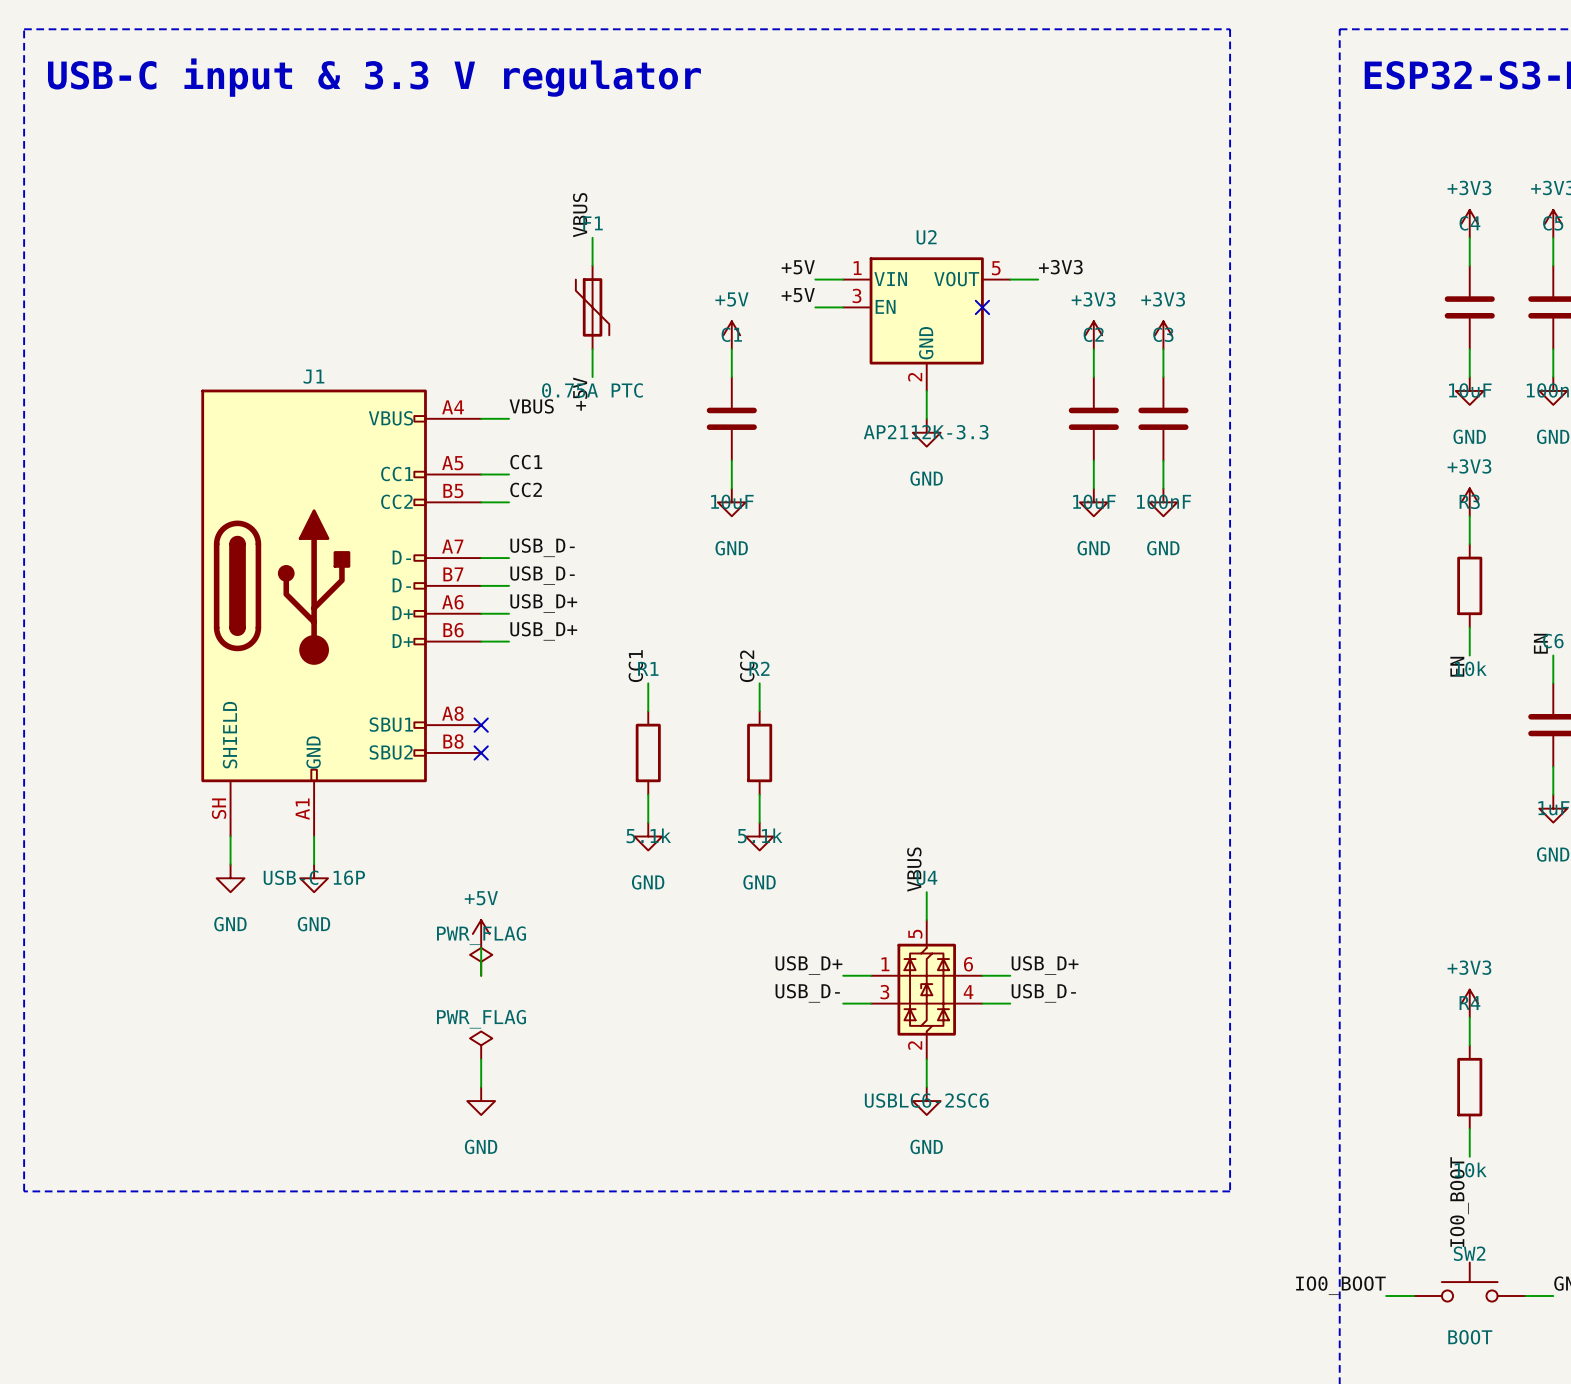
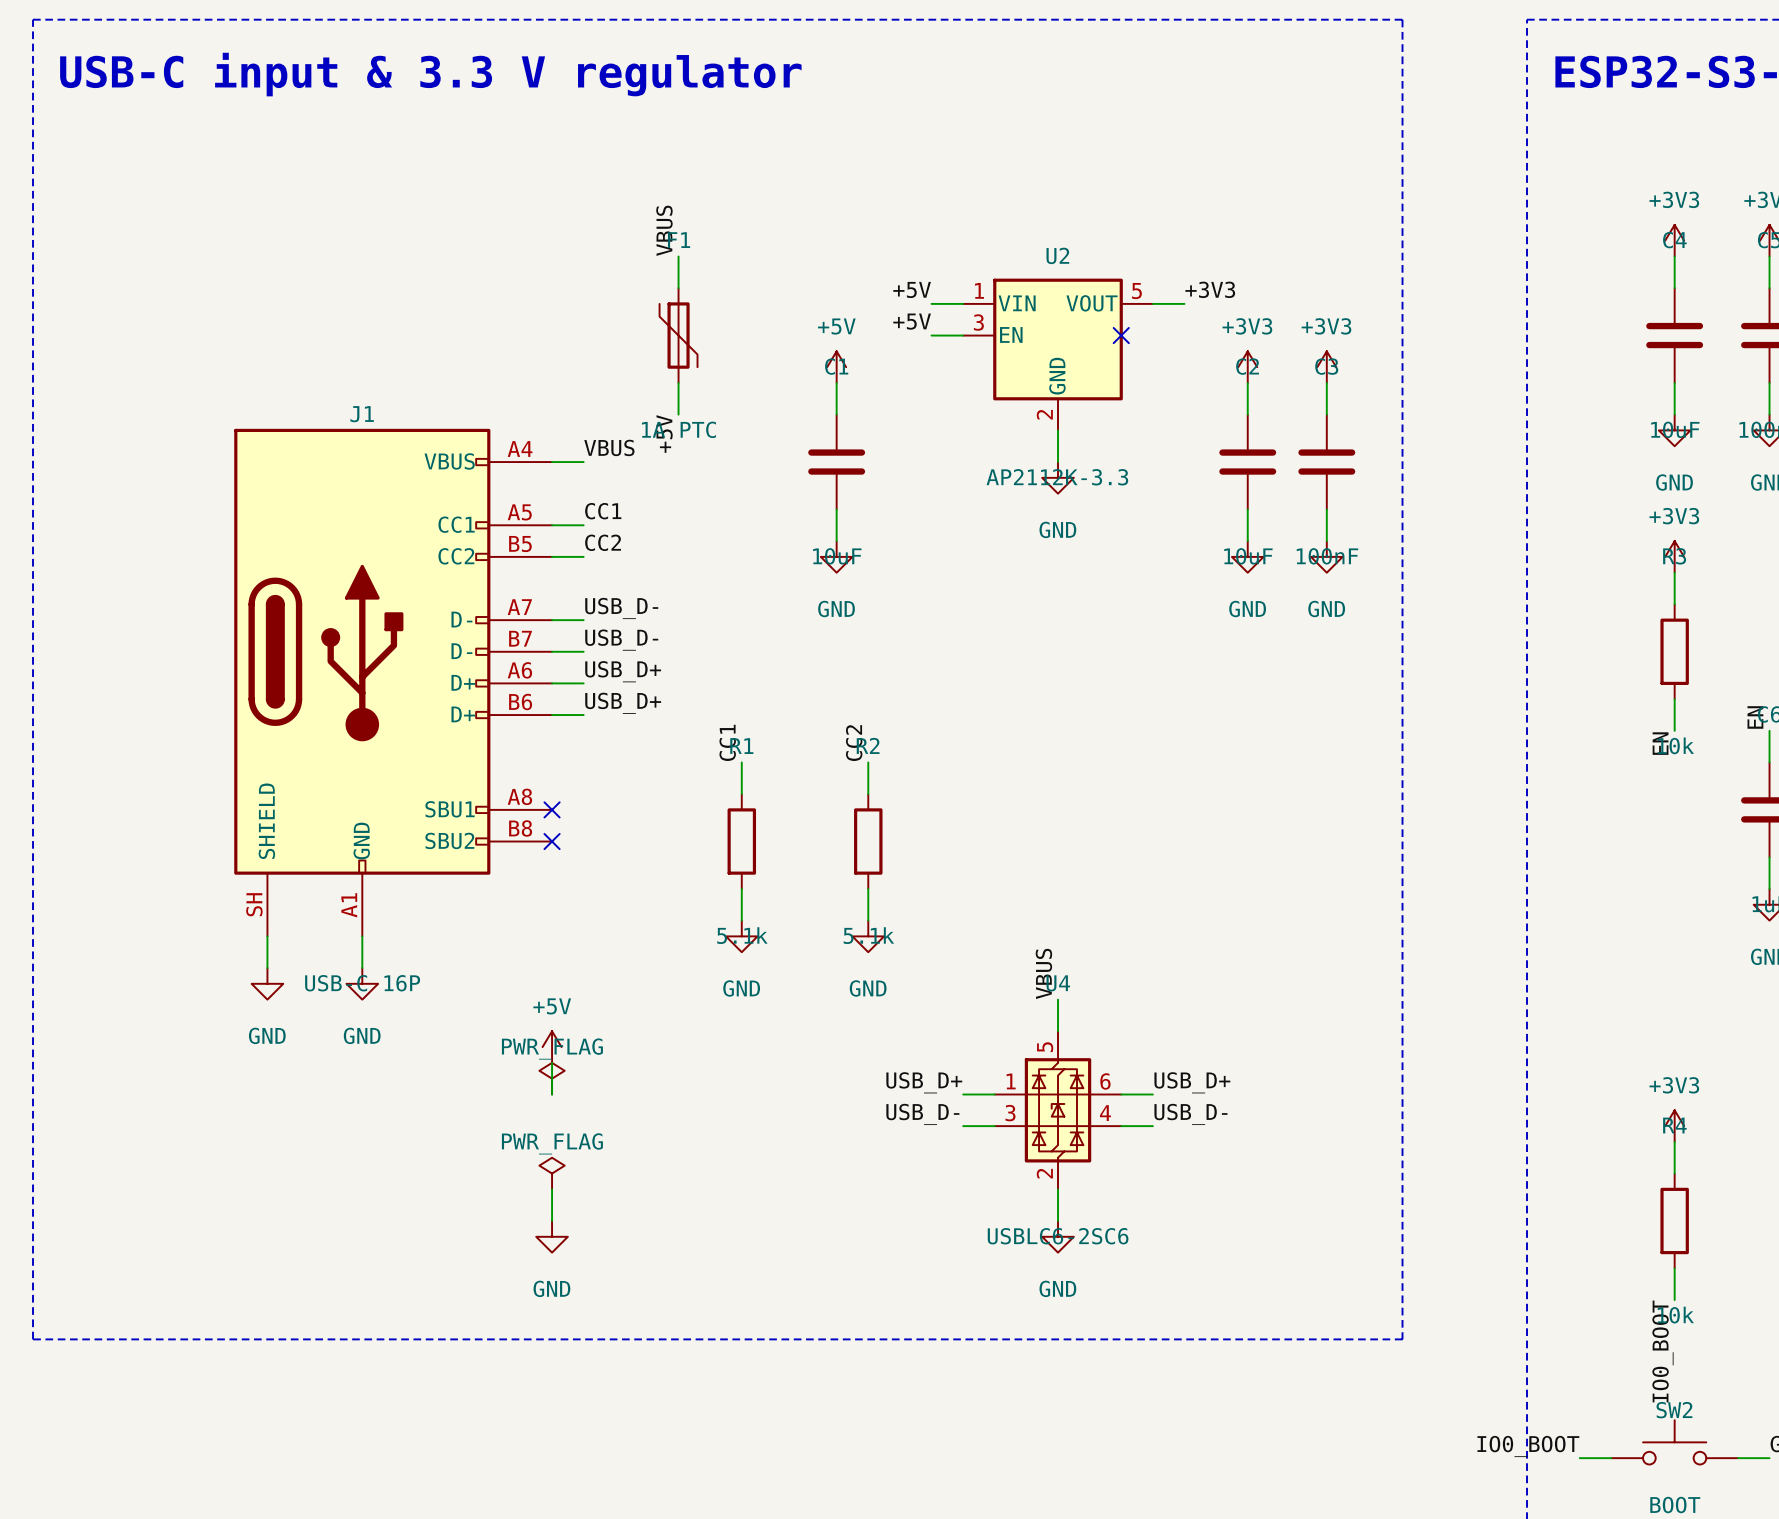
F1 value: 0.75A PTC (592, 390) -> 1A PTC (678, 429)

